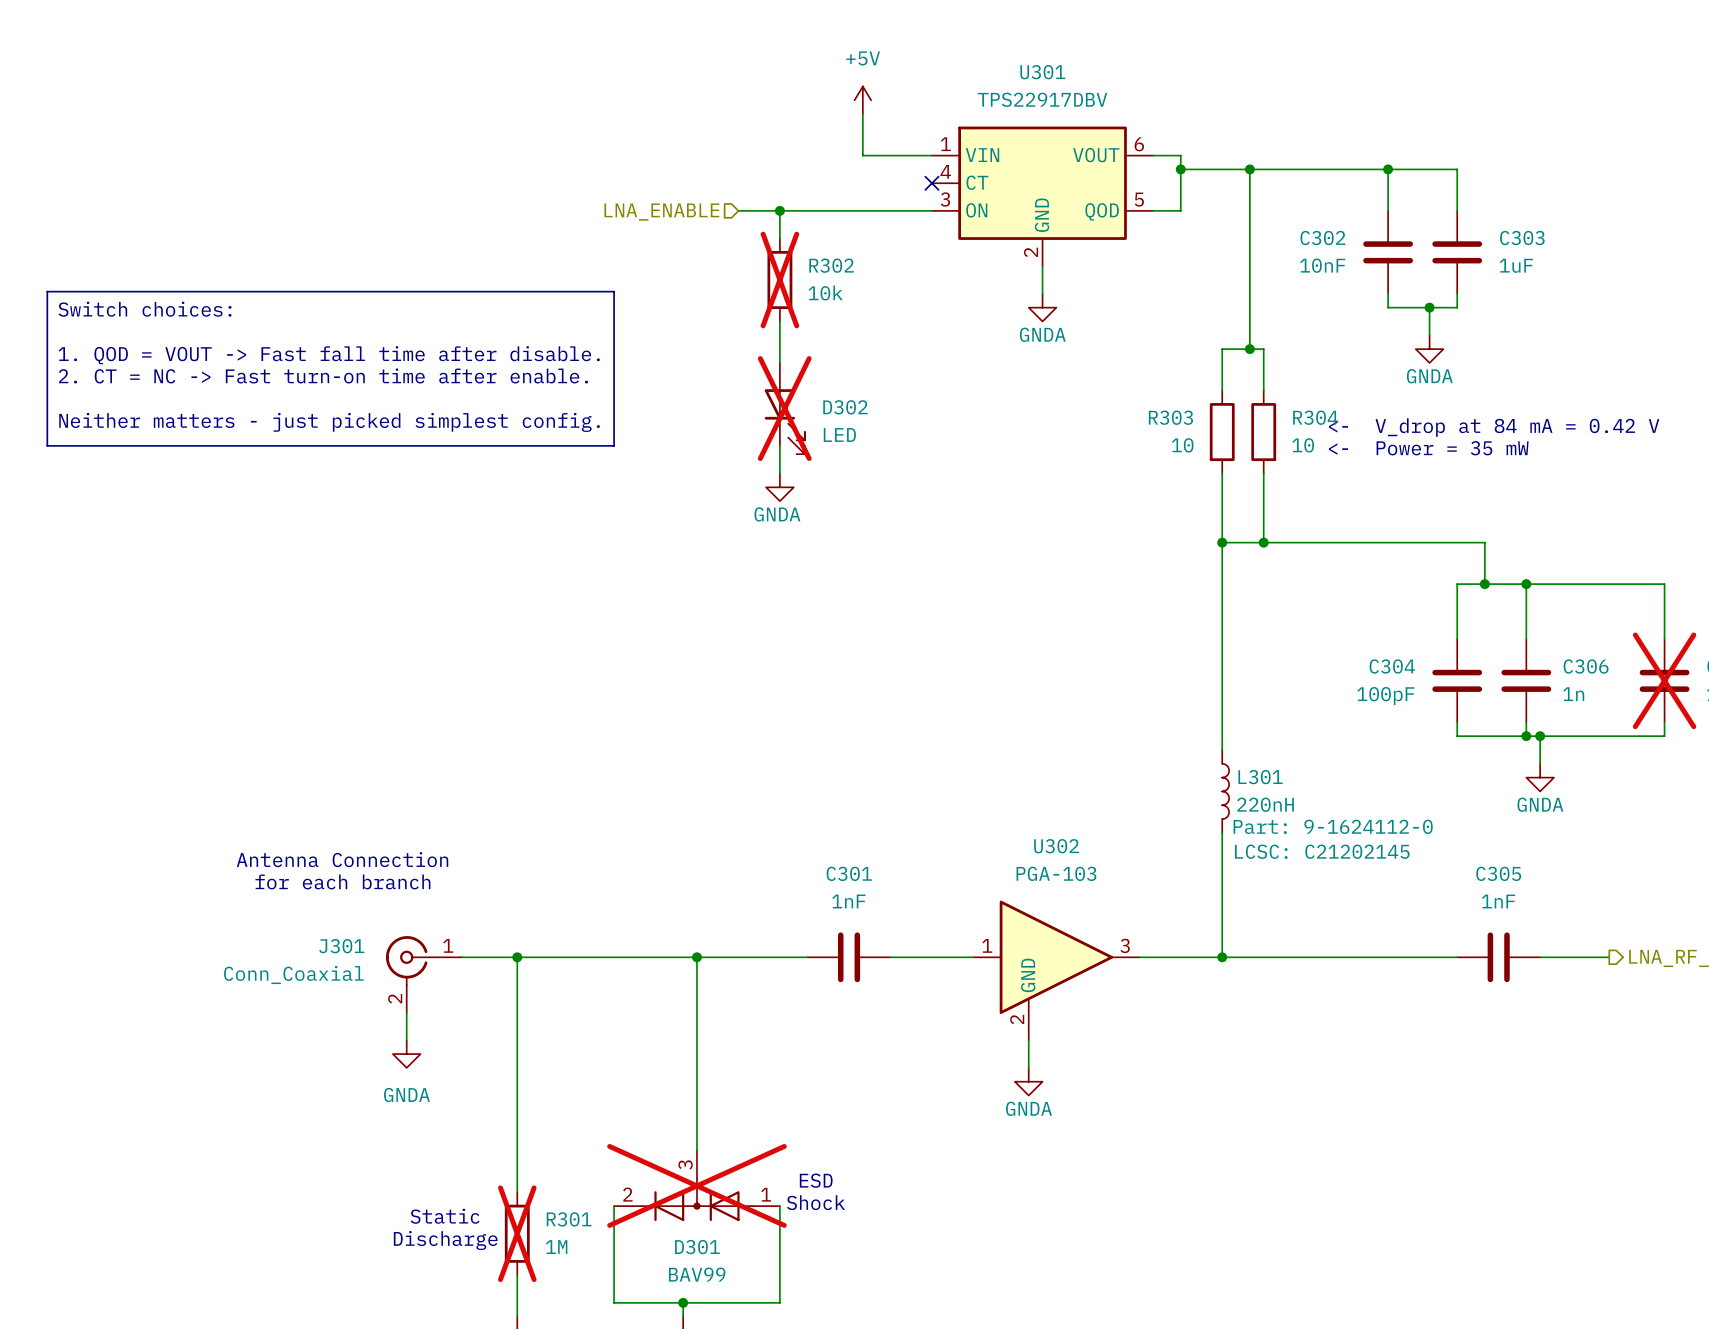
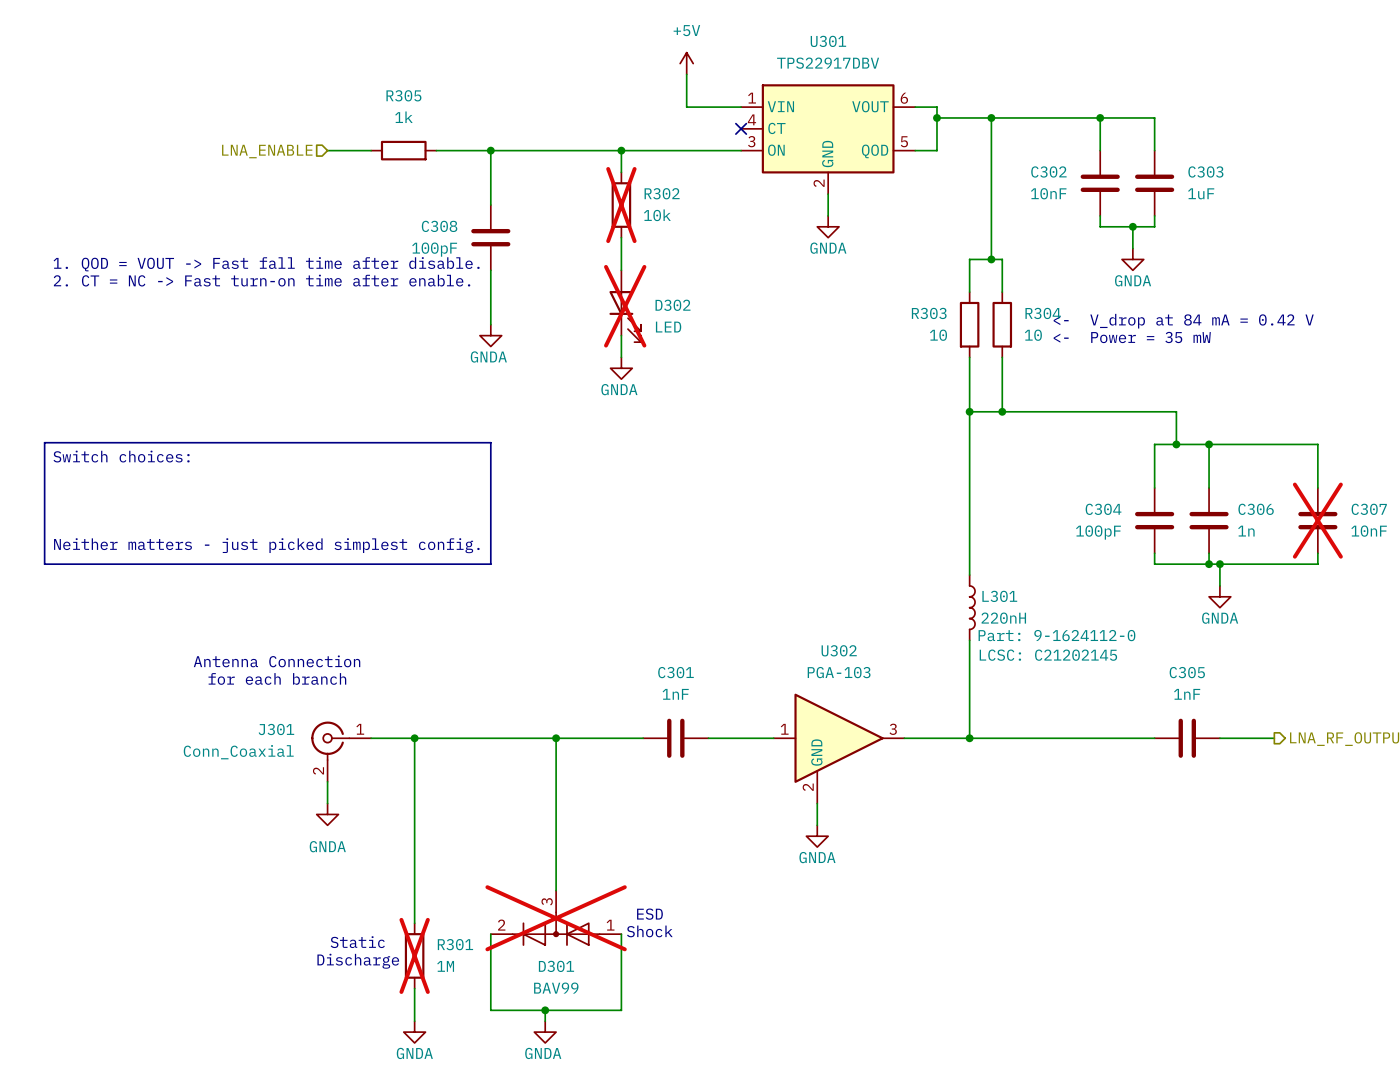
wire: none -> (327, 150) (371, 150)
R305: none -> 1k (403, 150)
wire: none -> (436, 150) (588, 150)
wire: none -> (490, 150) (490, 205)
junction: none -> (490, 150)
hierarchical label: none -> LNA_ENABLE (267, 151)
hierarchical label: LNA_ENABLE (661, 212) -> none
line: (47, 291) (614, 291) (614, 445) (47, 445) (47, 291) -> none
text: Switch choices: (145, 309) -> none
C308: none -> 100pF (490, 237)
text: Neither matters - just picked simplest config. (329, 422) -> none
power symbol: none -> GNDA (490, 335)
line: none -> (44, 442) (490, 442) (490, 564) (44, 564) (44, 442)
text: none -> Switch choices: (121, 456)
text: none -> Neither matters - just picked simplest config. (266, 545)

